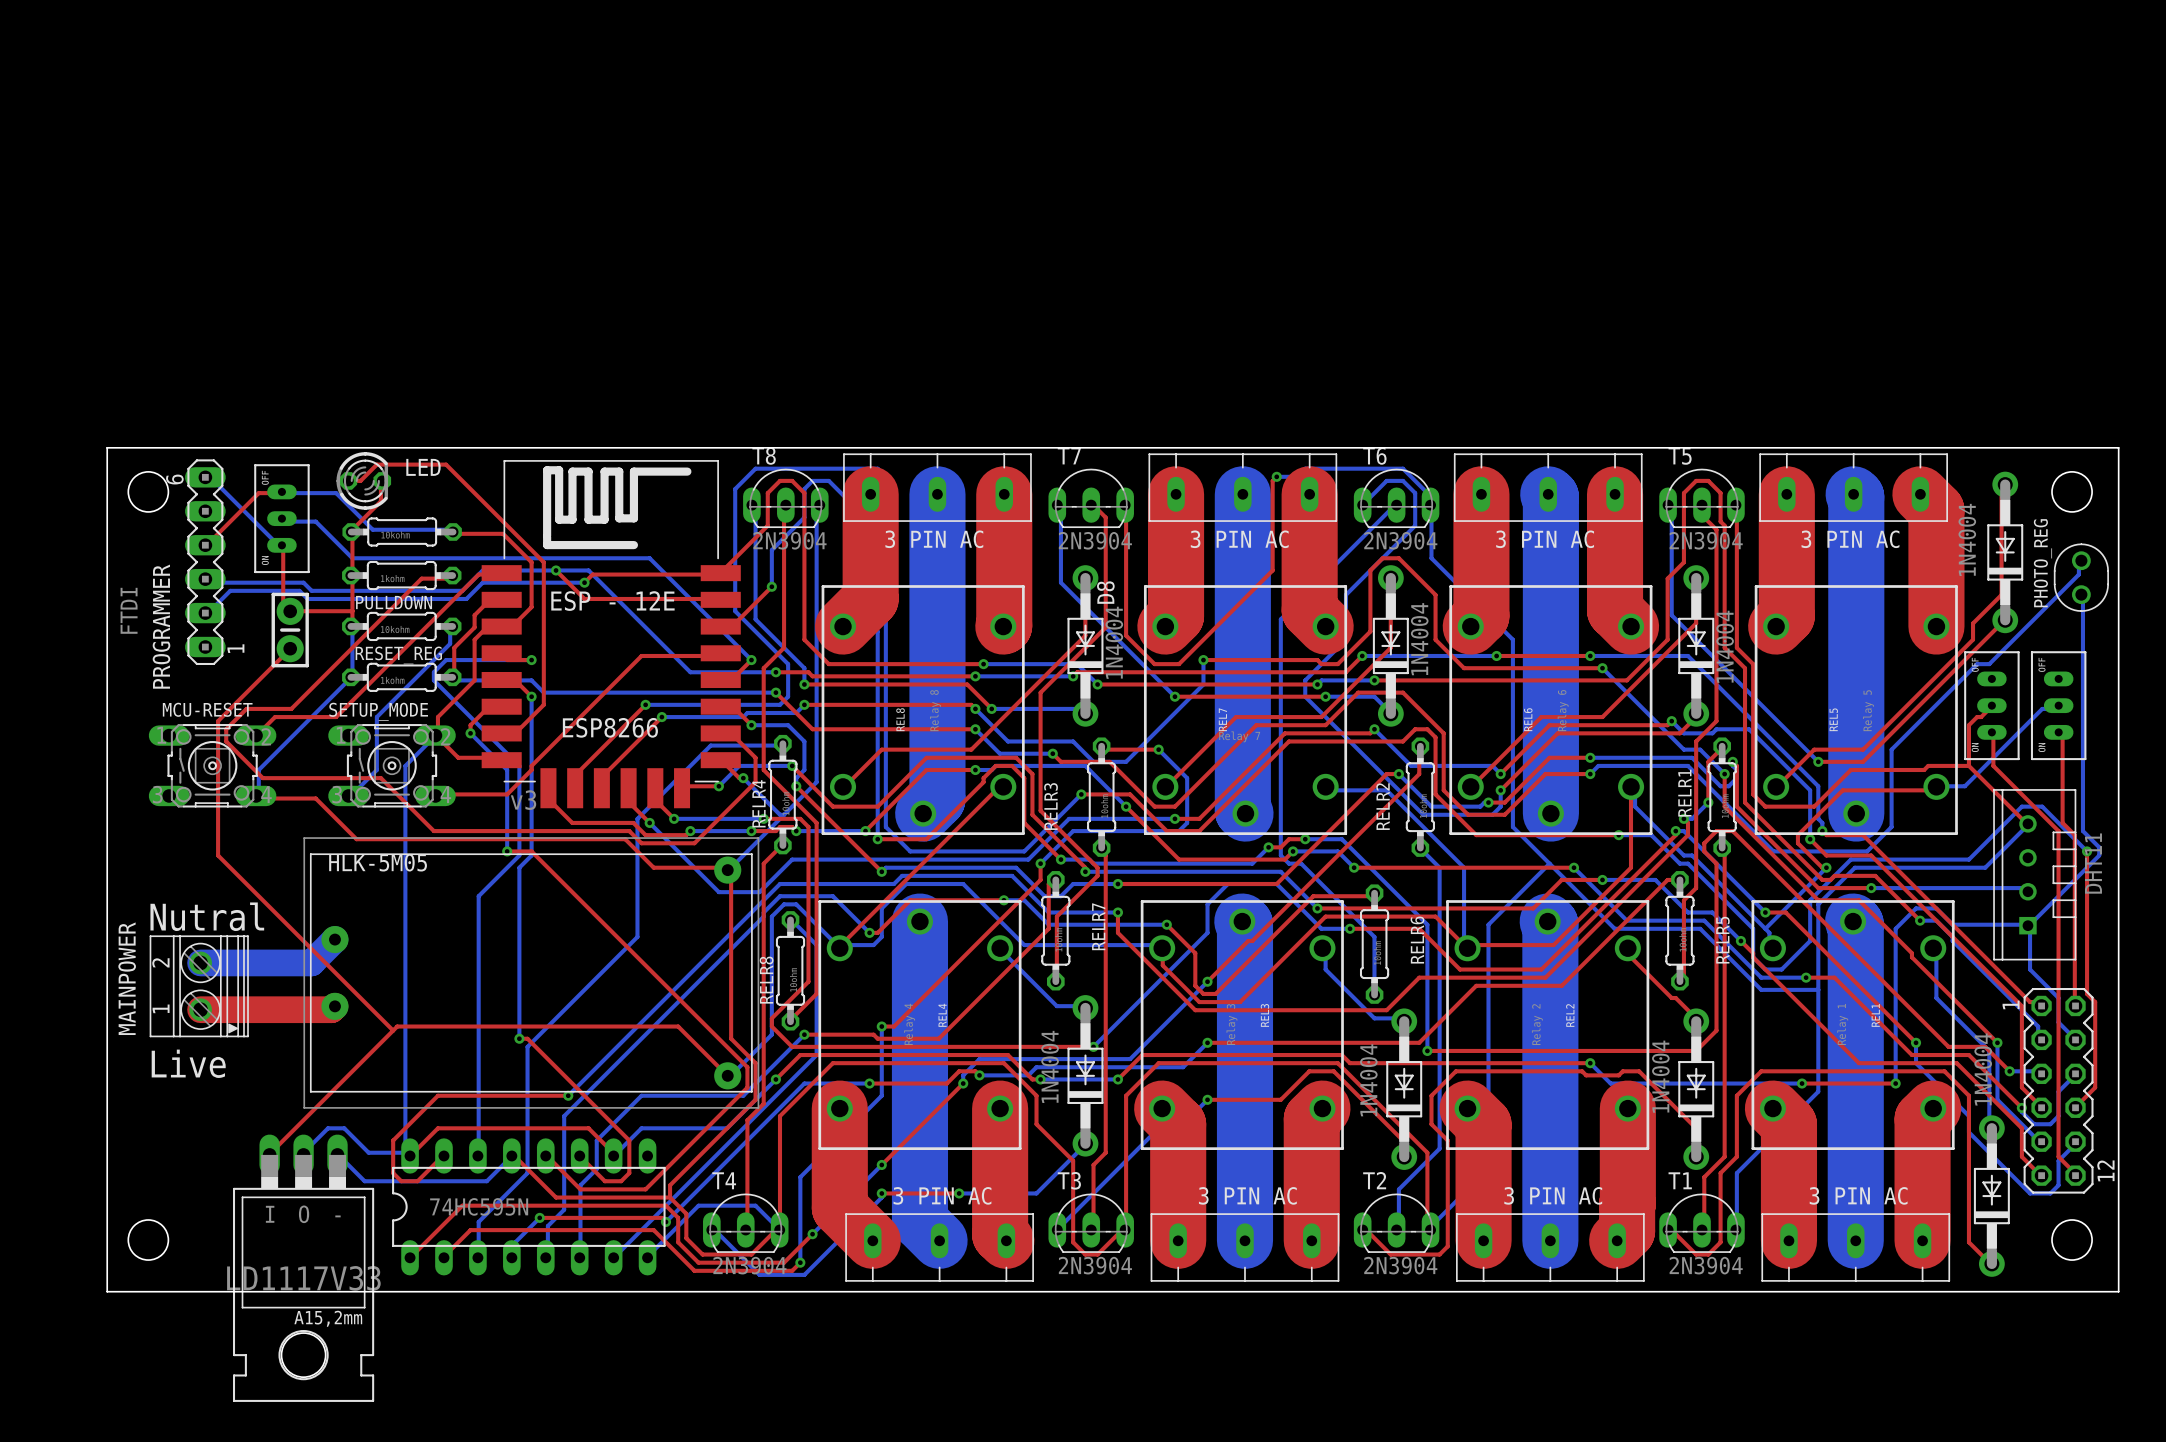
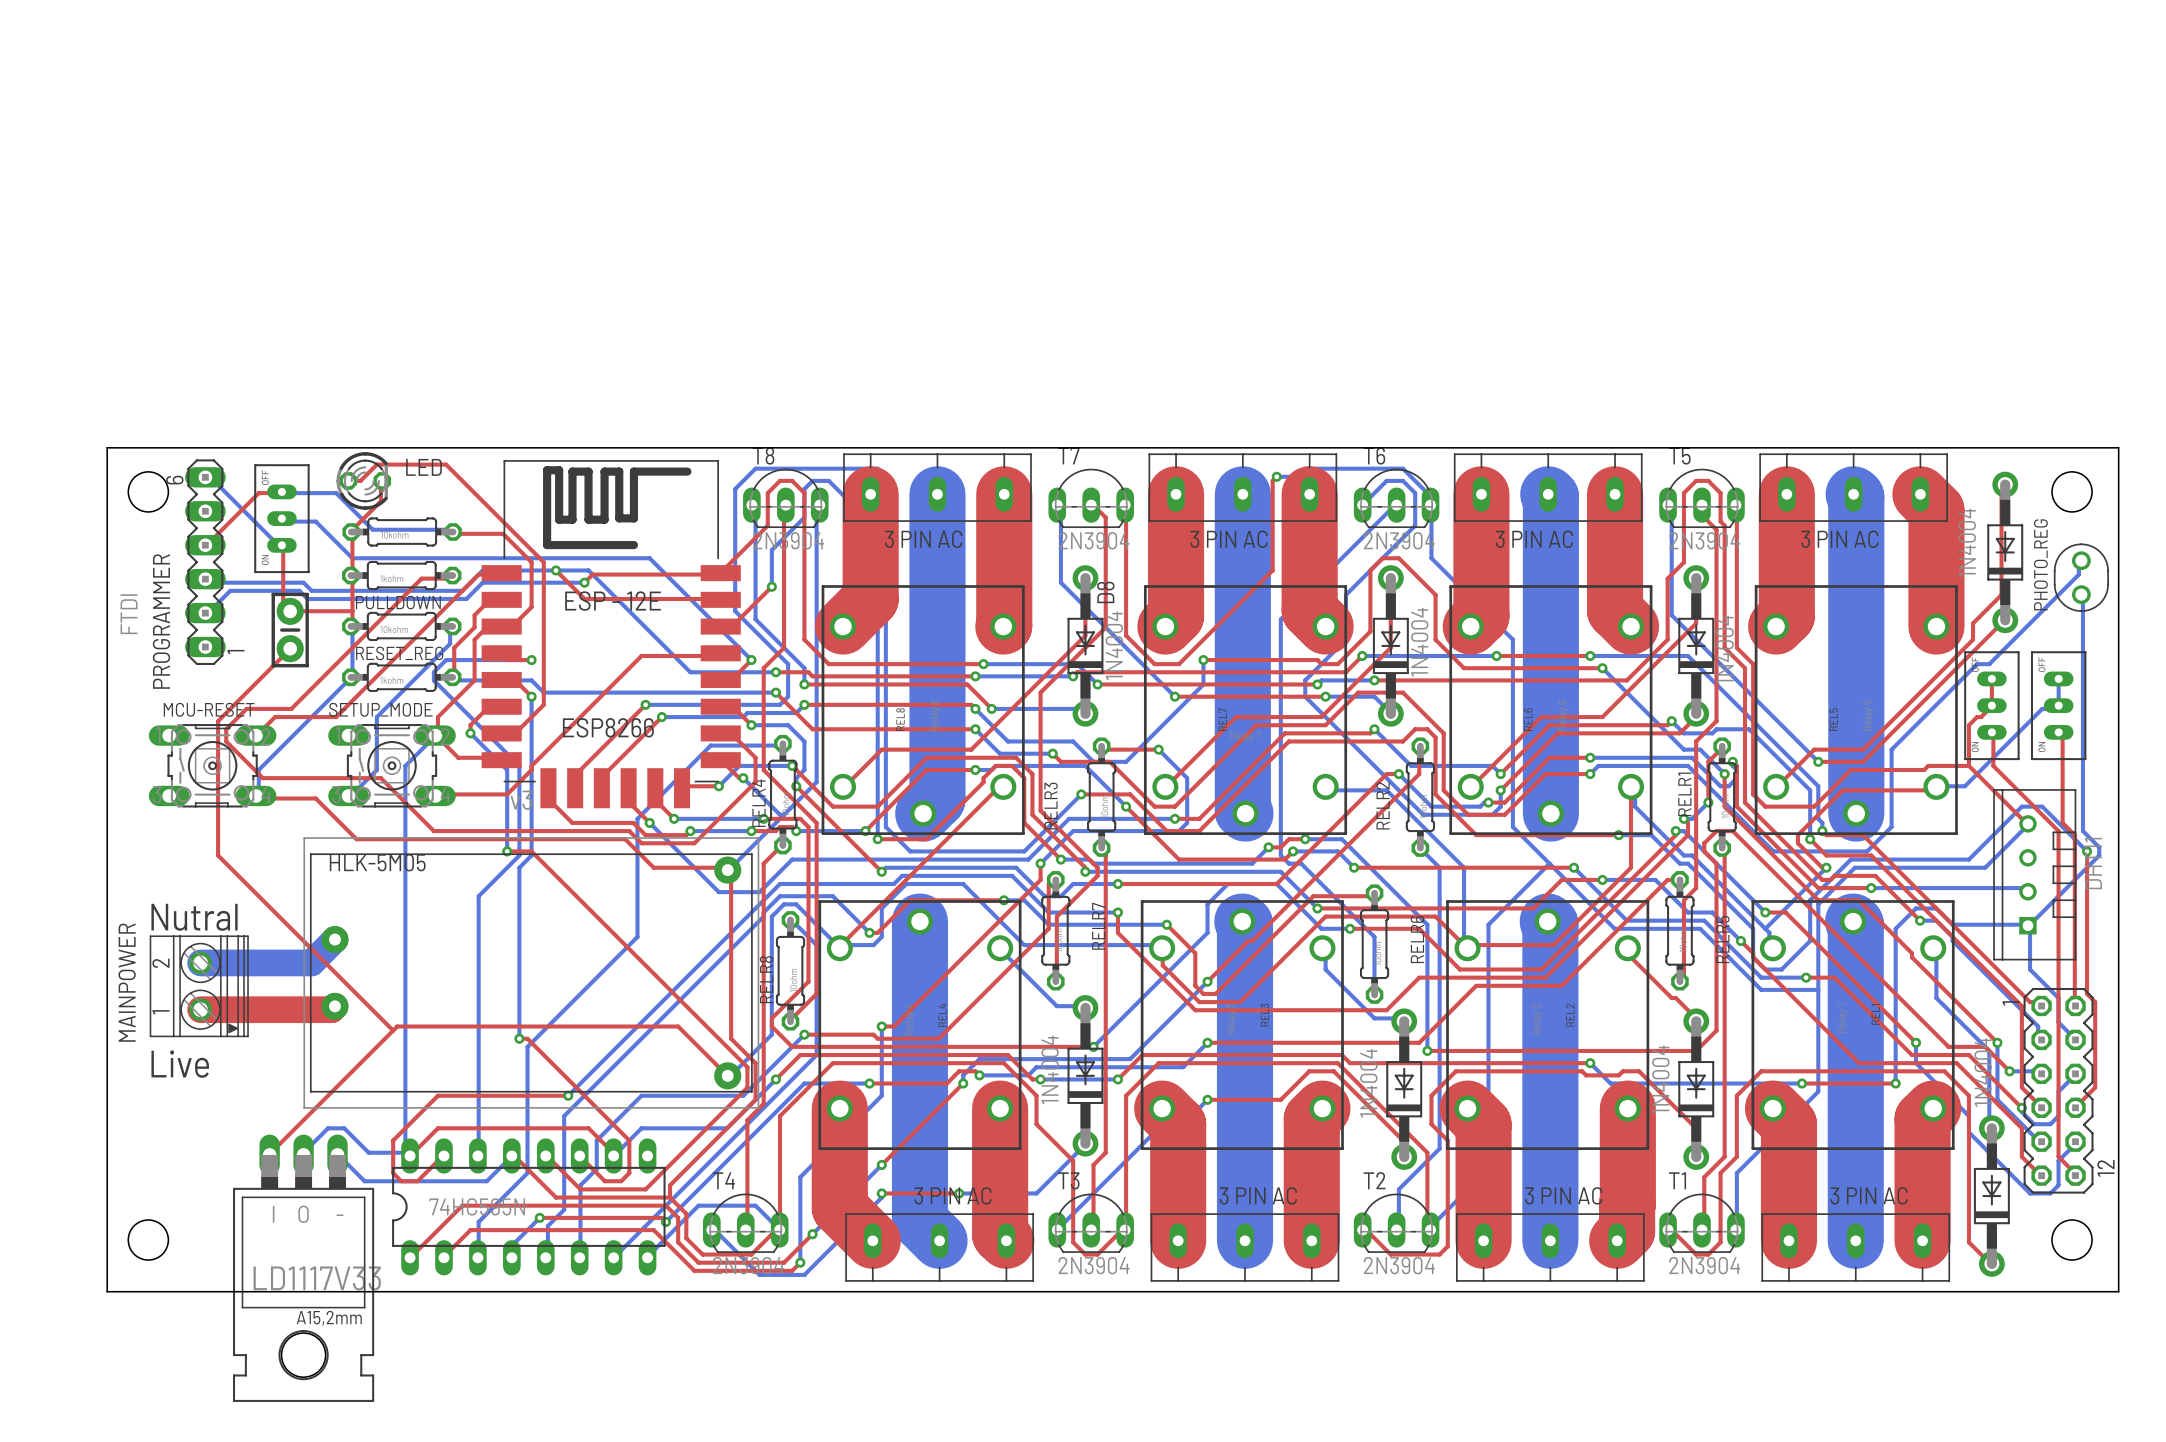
top track: none -> (1991, 678) (1991, 705)
bottom track: none -> (2058, 678) (2058, 705)

